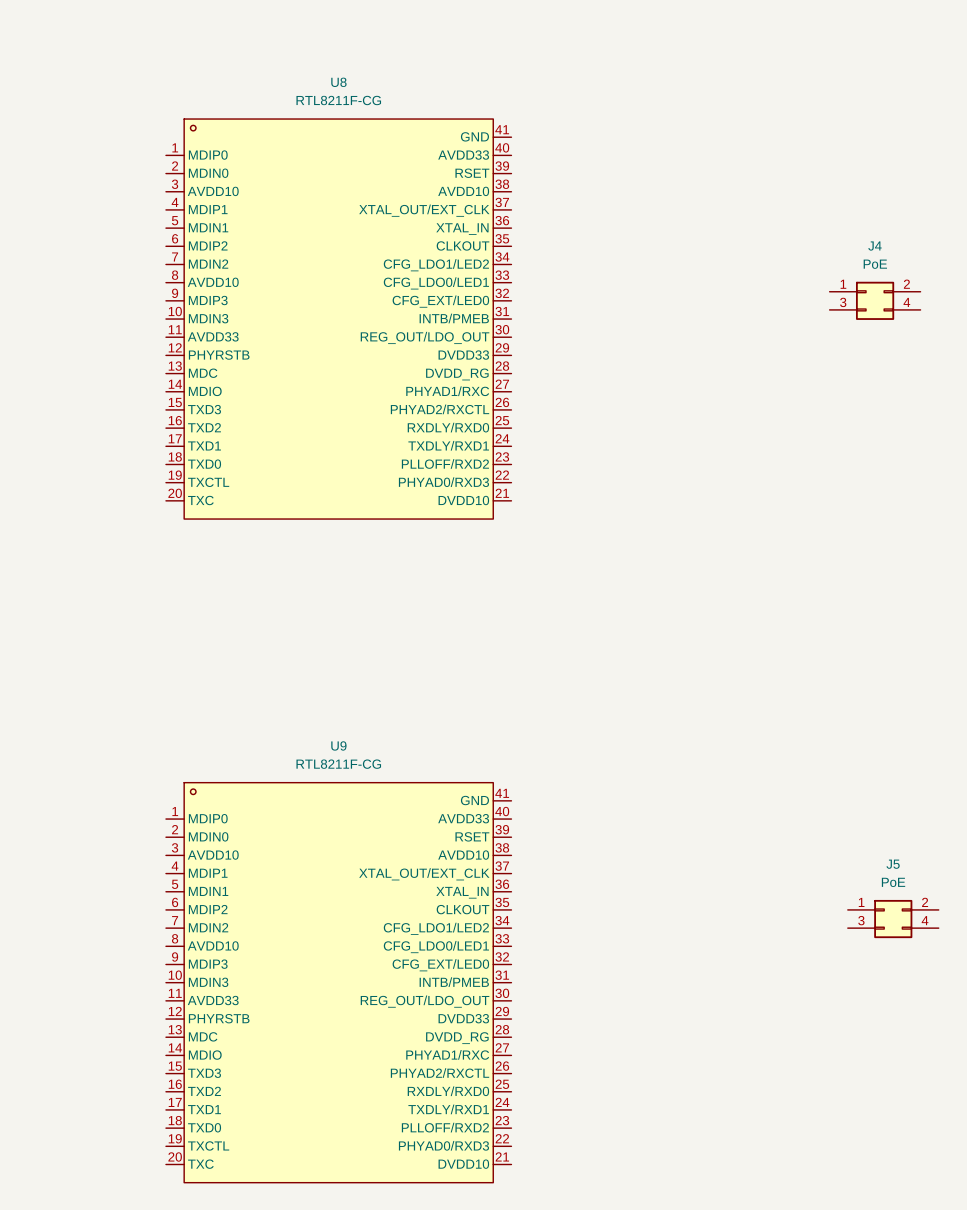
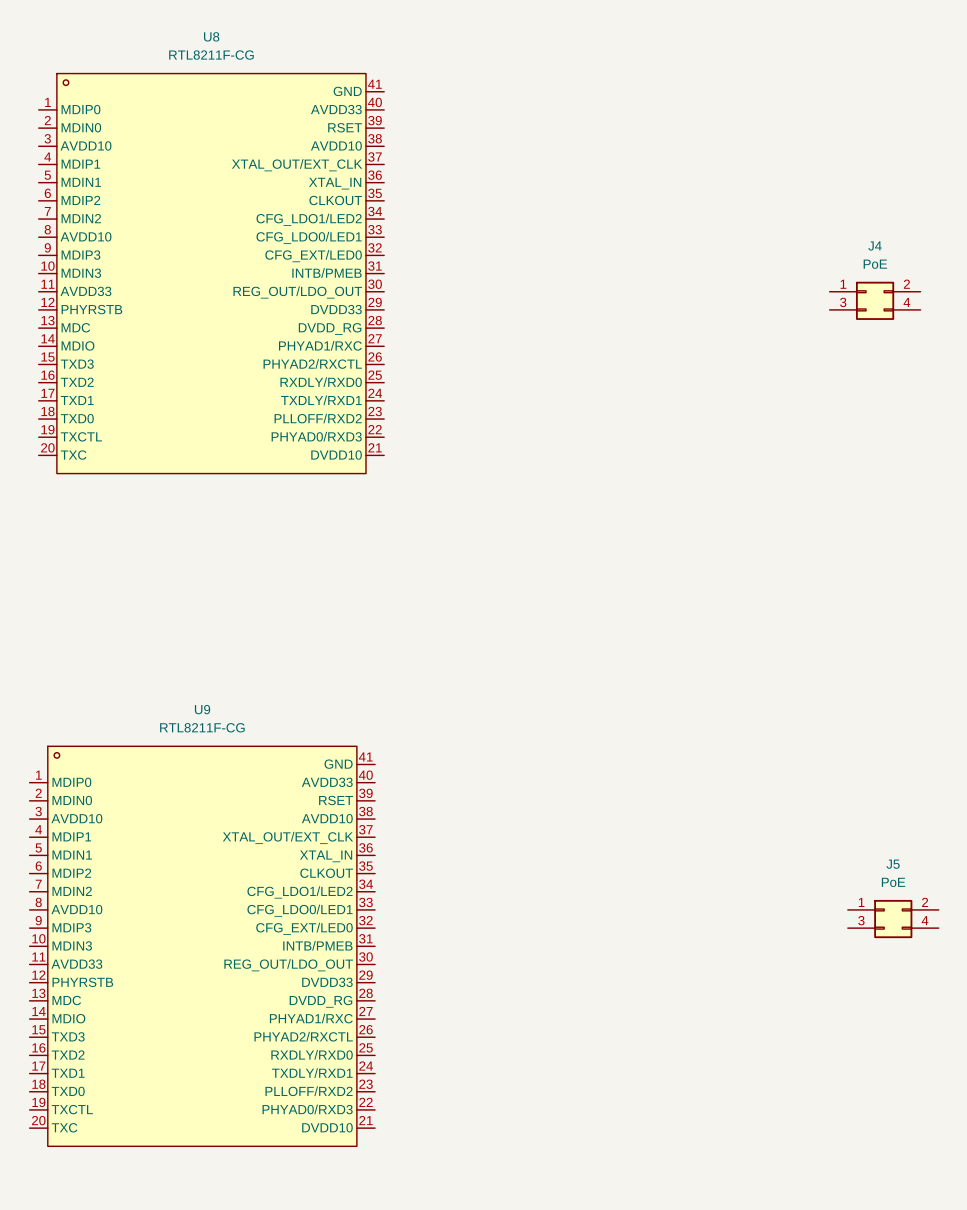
U8 position: (338, 319) -> (211, 273)
U9 position: (338, 982) -> (202, 946)

